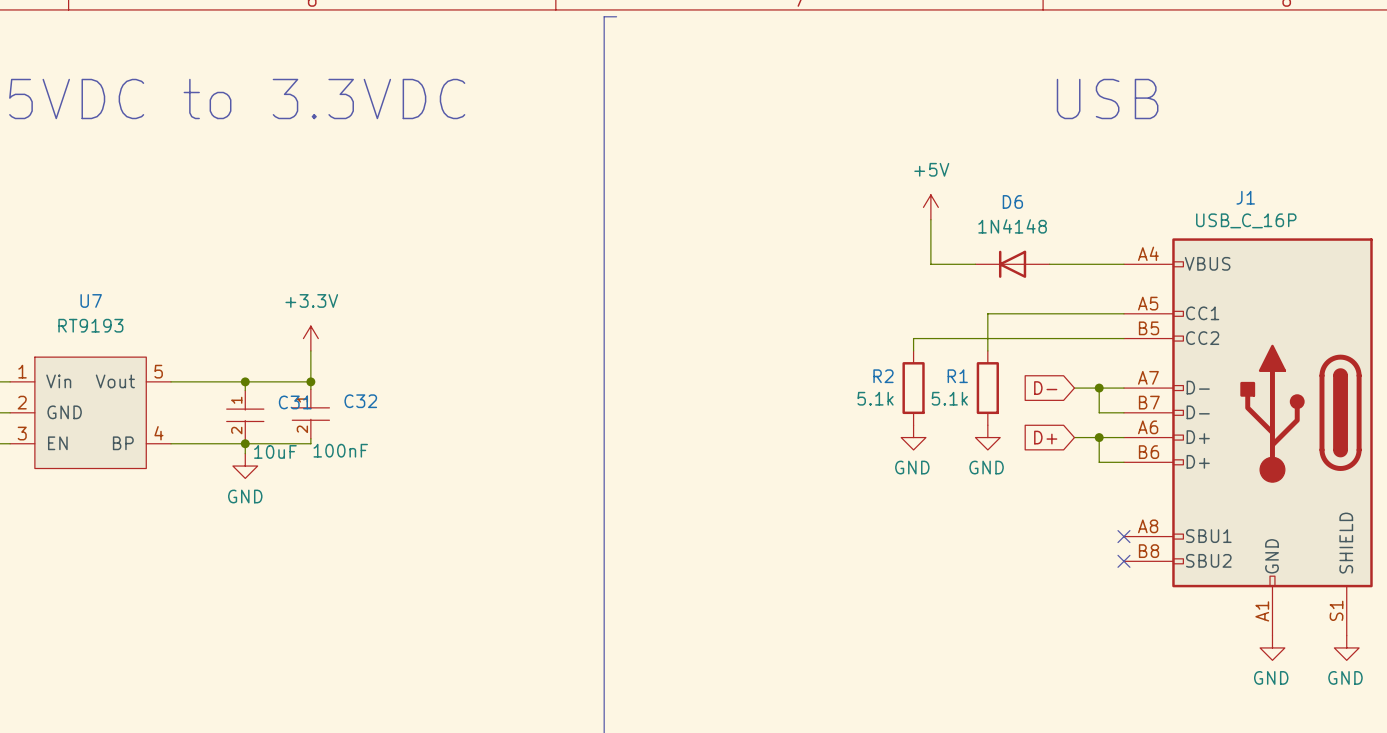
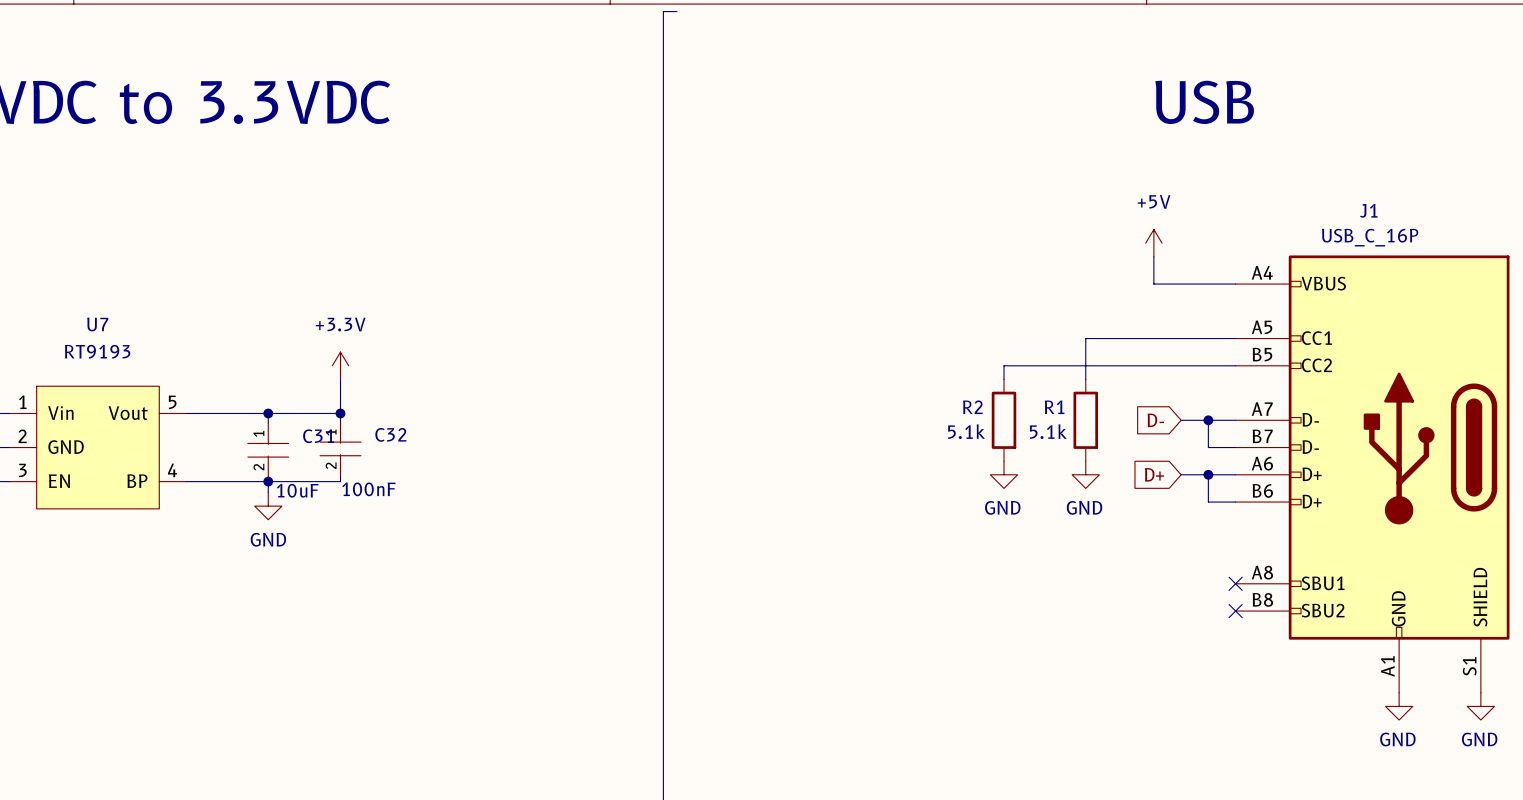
power symbol position: +5V (930, 207) -> +5V (1153, 243)
wire: (930, 219) (930, 264) (975, 264) -> none
wire: none -> (1153, 256) (1153, 284)
D6: 1N4148 (1012, 264) -> none

